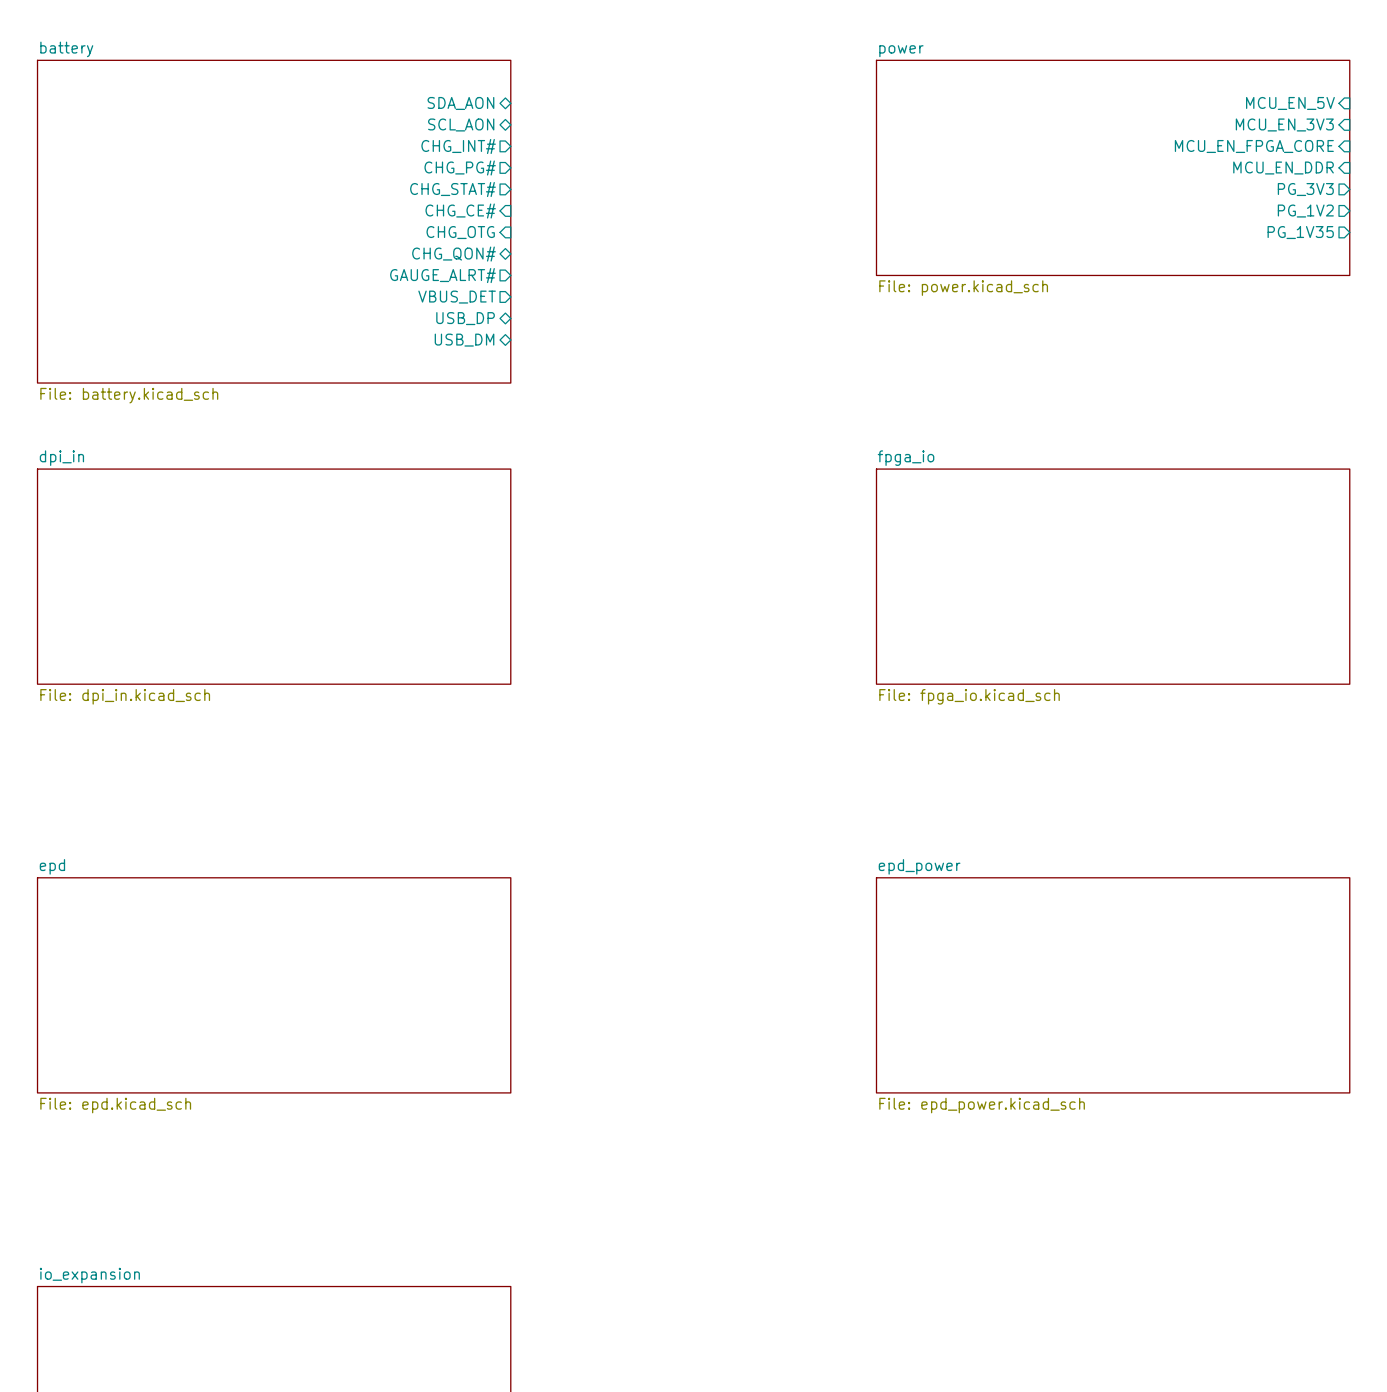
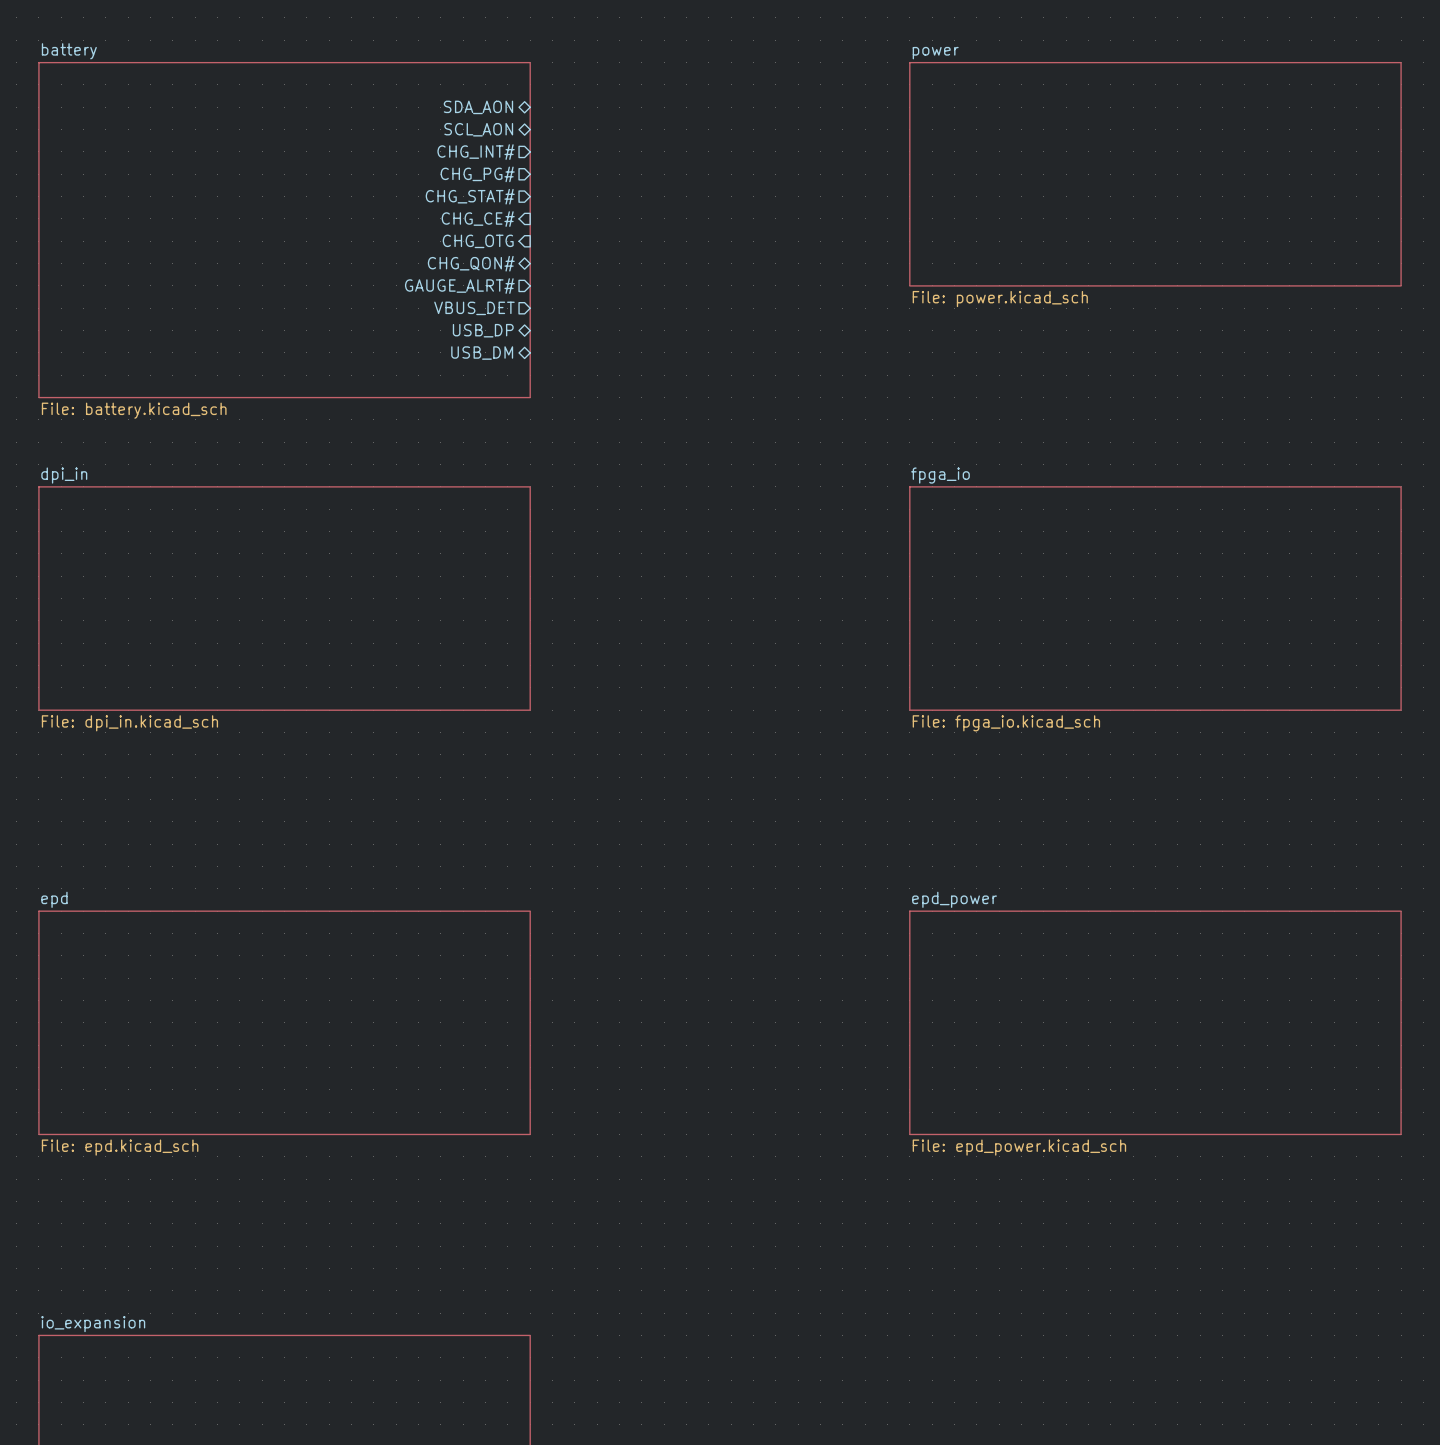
sheet pin: MCU_EN_5V (1290, 103) -> none
sheet pin: MCU_EN_3V3 (1284, 124) -> none
sheet pin: MCU_EN_FPGA_CORE (1254, 146) -> none
sheet pin: MCU_EN_DDR (1283, 168) -> none
sheet pin: PG_3V3 (1305, 189) -> none
sheet pin: PG_1V2 (1305, 211) -> none
sheet pin: PG_1V35 (1300, 232) -> none

